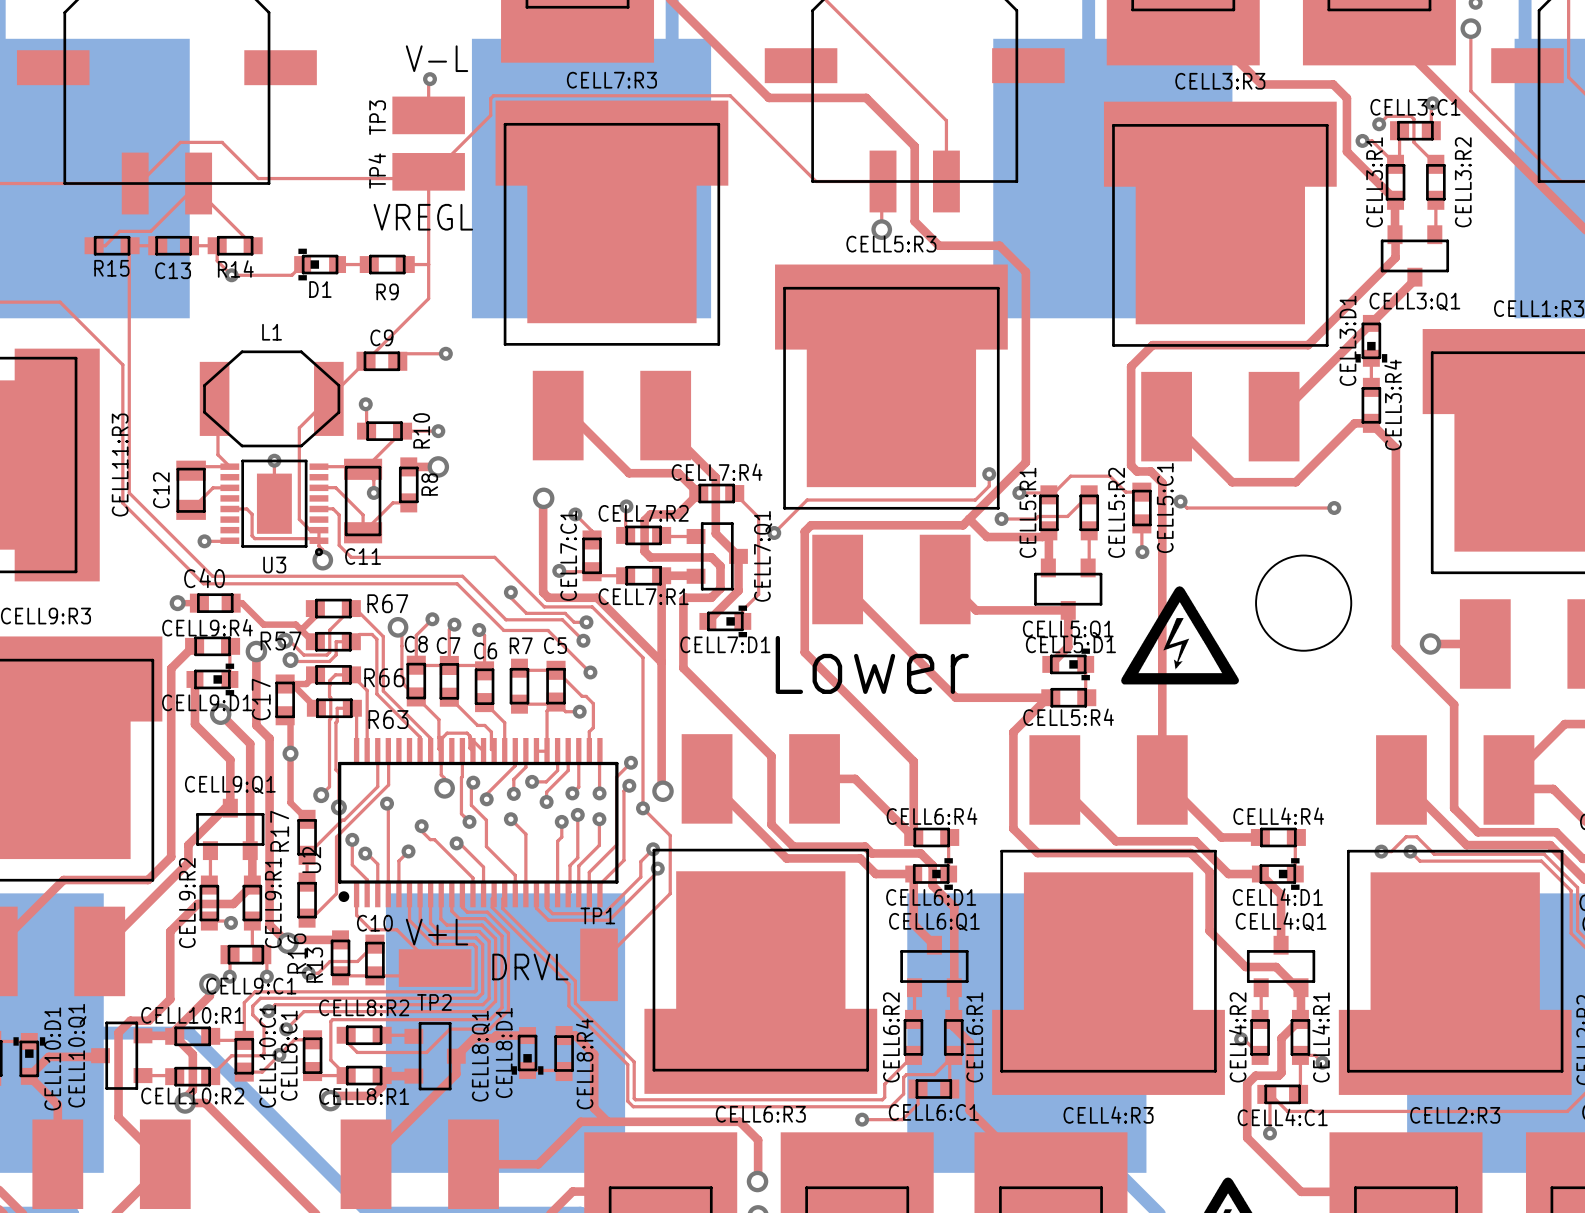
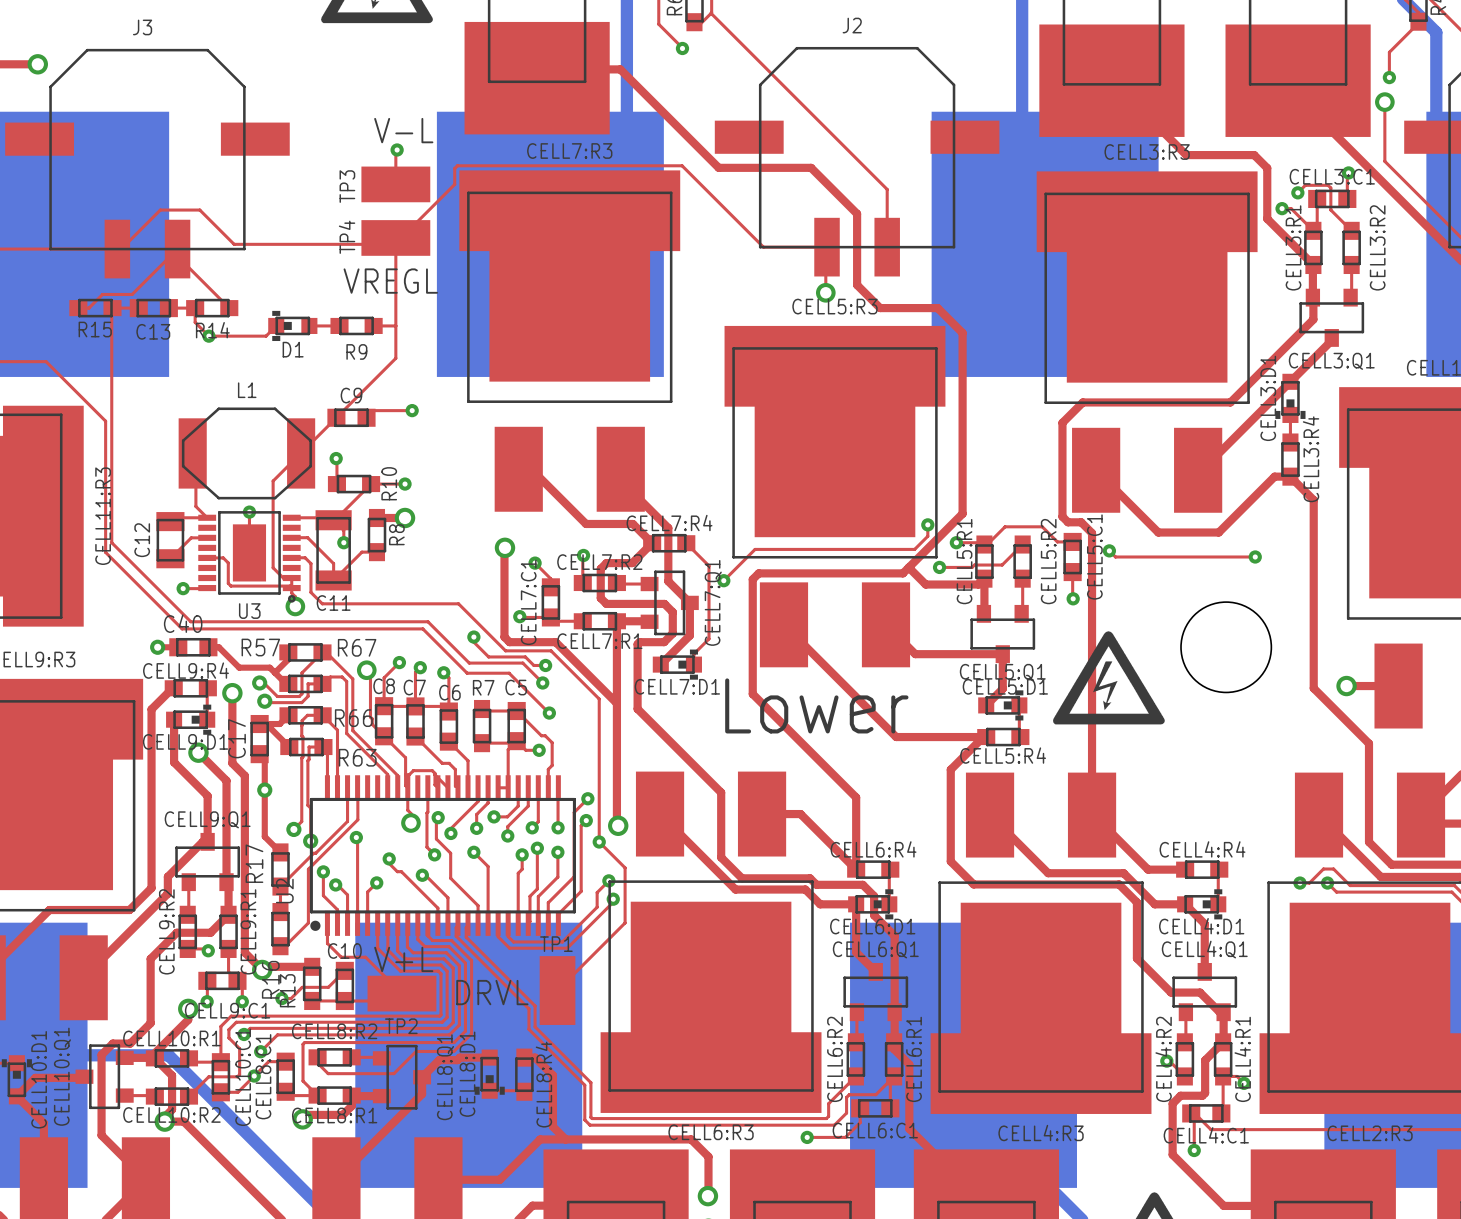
R57 name position: R57 (281, 641) -> R57 (260, 647)

